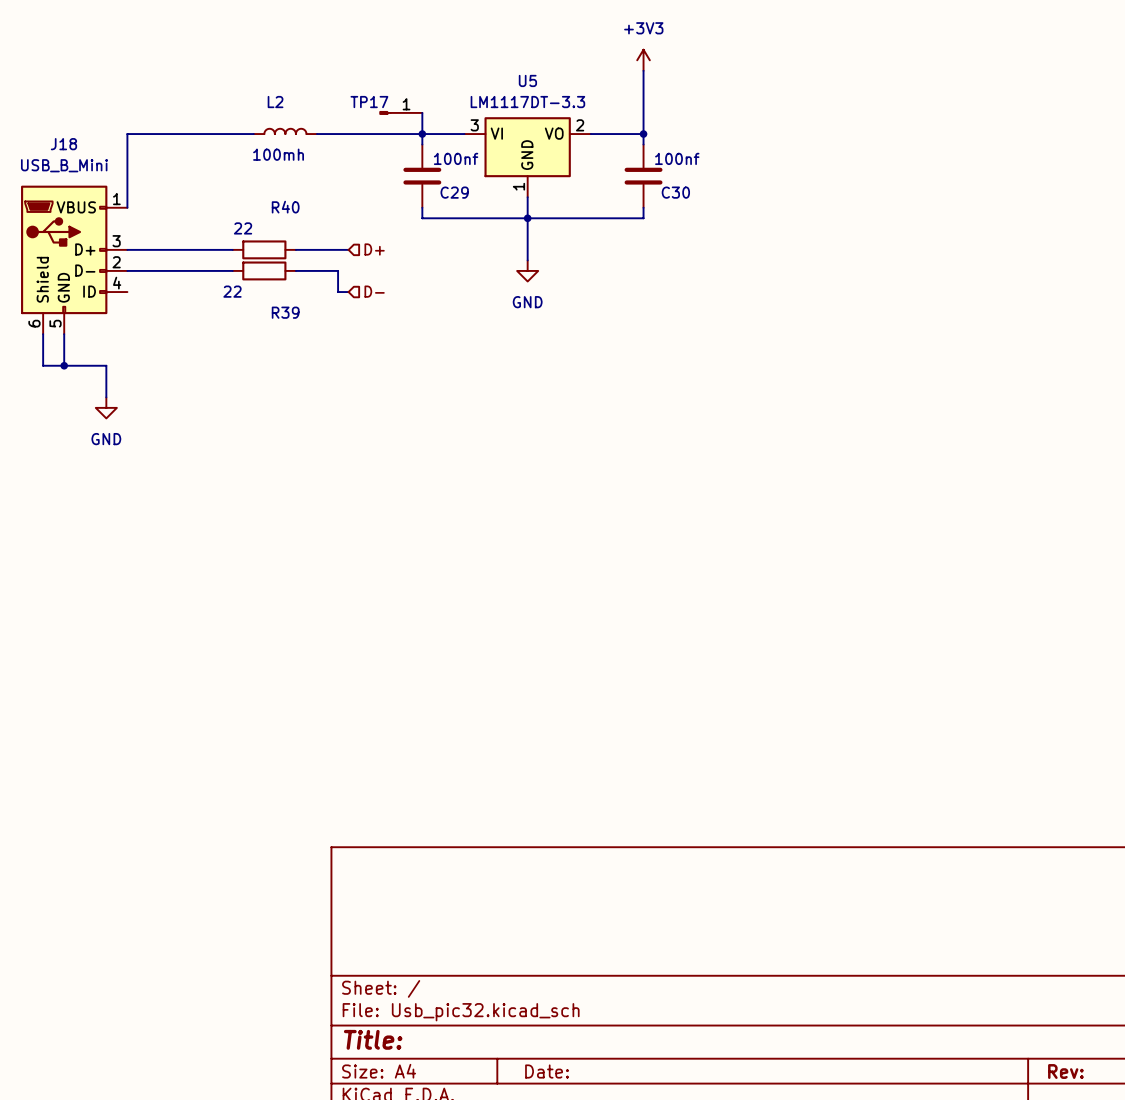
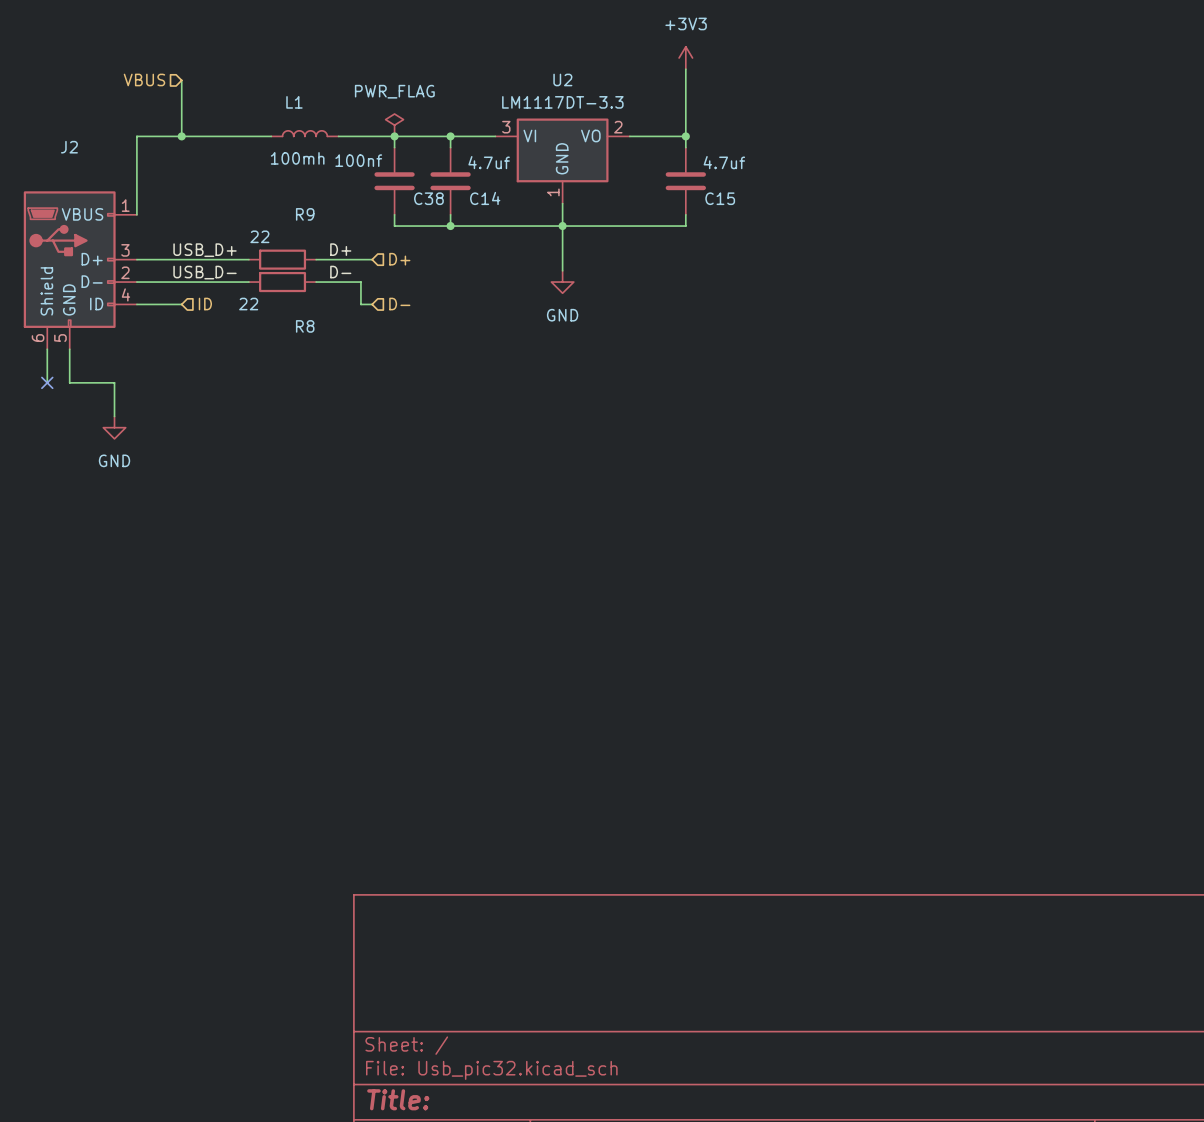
hierarchical label: none -> VBUS (144, 79)
U5 name: U5 (527, 80) -> U2 (562, 79)
wire: none -> (181, 80) (181, 136)
L2 name: L2 (275, 102) -> L1 (294, 102)
TP17: (400, 112) -> none
wire: (422, 112) (422, 134) -> none
power symbol: none -> PWR_FLAG (394, 125)
junction: none -> (181, 136)
wire: none -> (394, 136) (394, 147)
junction: none -> (394, 136)
J18 name: J18 (63, 144) -> J2 (69, 147)
C29 value: 100nf (456, 158) -> 4.7uf (489, 162)
C30 value: 100nf (677, 158) -> 4.7uf (724, 162)
J18 value: USB_B_Mini (64, 165) -> none
C38: none -> 100nf (394, 181)
C29 name: C29 (454, 192) -> C14 (485, 198)
C30 name: C30 (675, 192) -> C15 (720, 198)
R40 name: R40 (285, 207) -> R9 (305, 214)
wire: none -> (394, 214) (394, 226) (450, 226)
junction: none -> (450, 226)
label: none -> USB_D+ (205, 250)
label: none -> D+ (340, 249)
label: none -> D- (340, 272)
label: none -> USB_D- (205, 272)
hierarchical label: none -> ID (205, 304)
wire: none -> (136, 304) (181, 304)
R39 name: R39 (285, 312) -> R8 (305, 326)
wire: (43, 365) (64, 365) -> none
no-connect mark: none -> (47, 382)
junction: (64, 365) -> none

